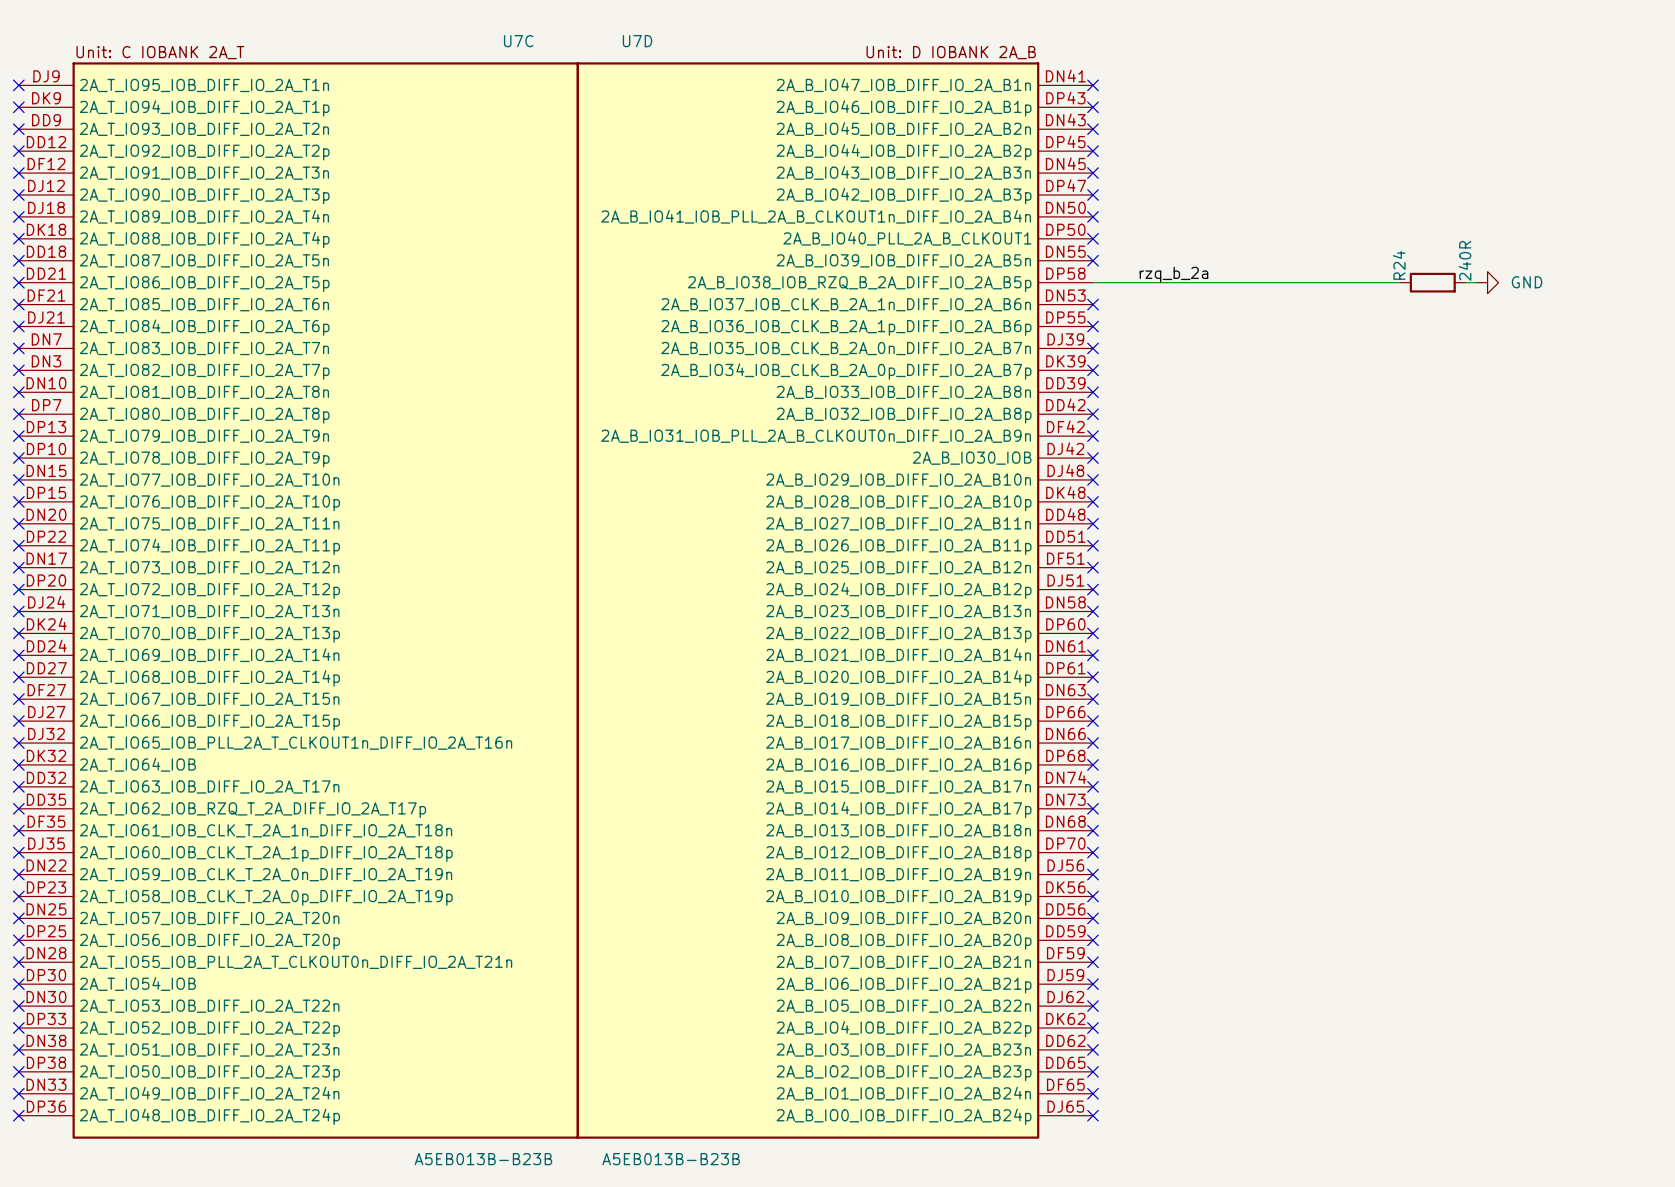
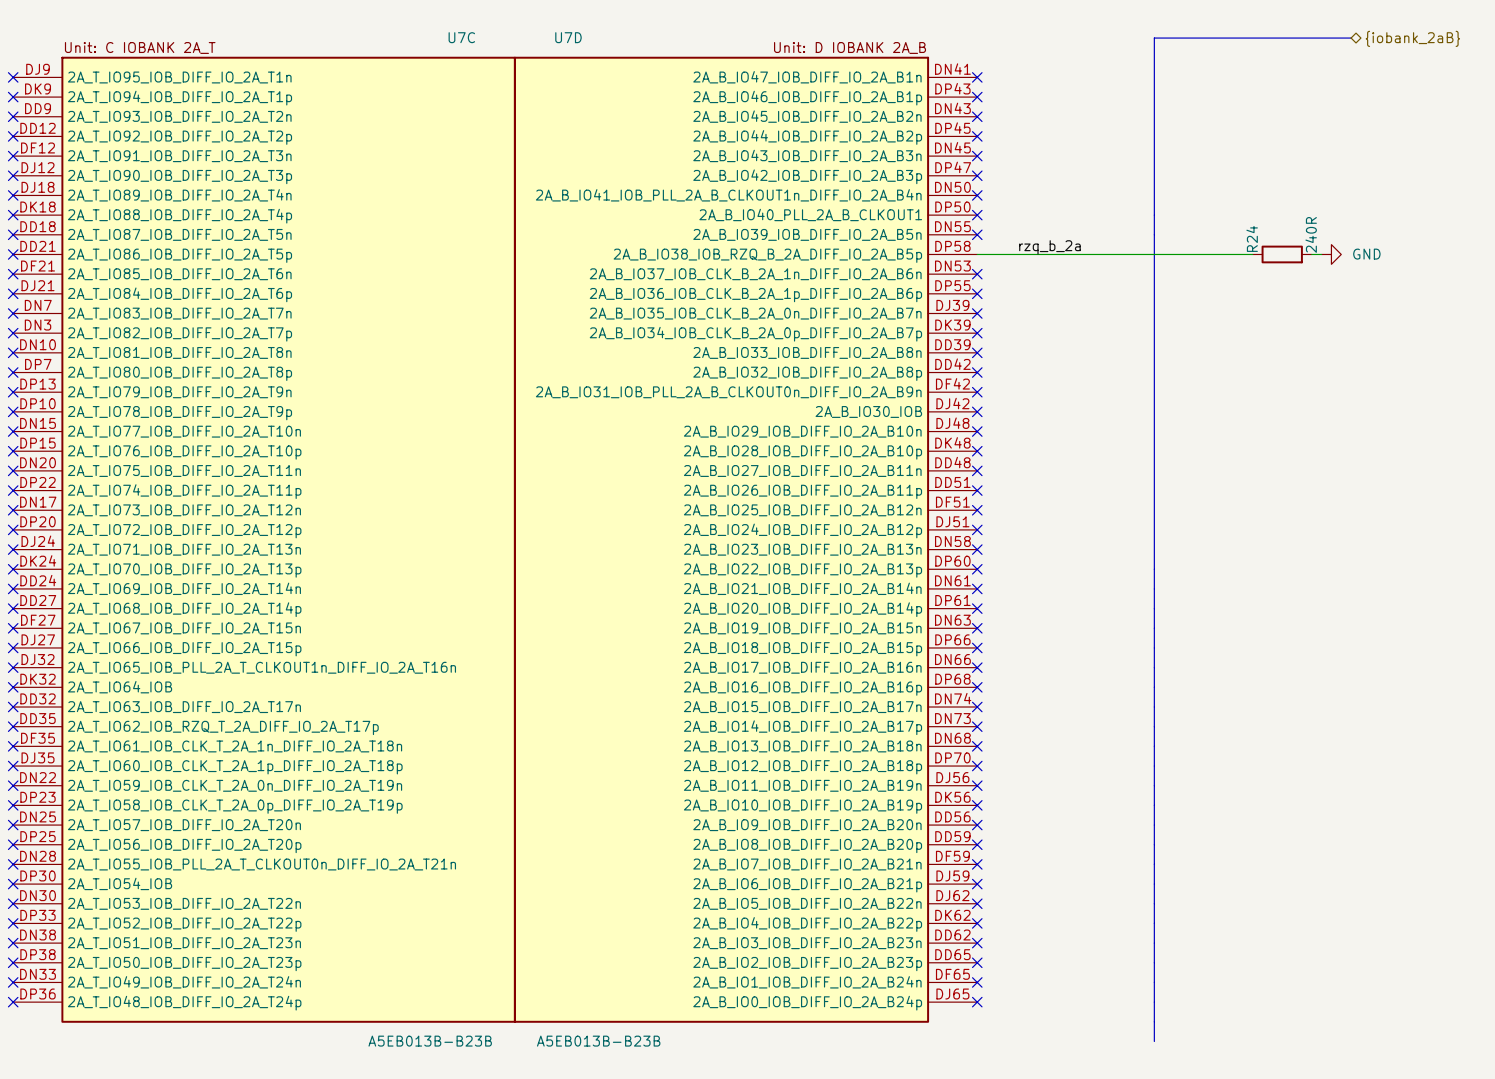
bus: none -> (1351, 38) (1154, 38) (1154, 1041)
hierarchical label: none -> {iobank_2aB} (1412, 38)

